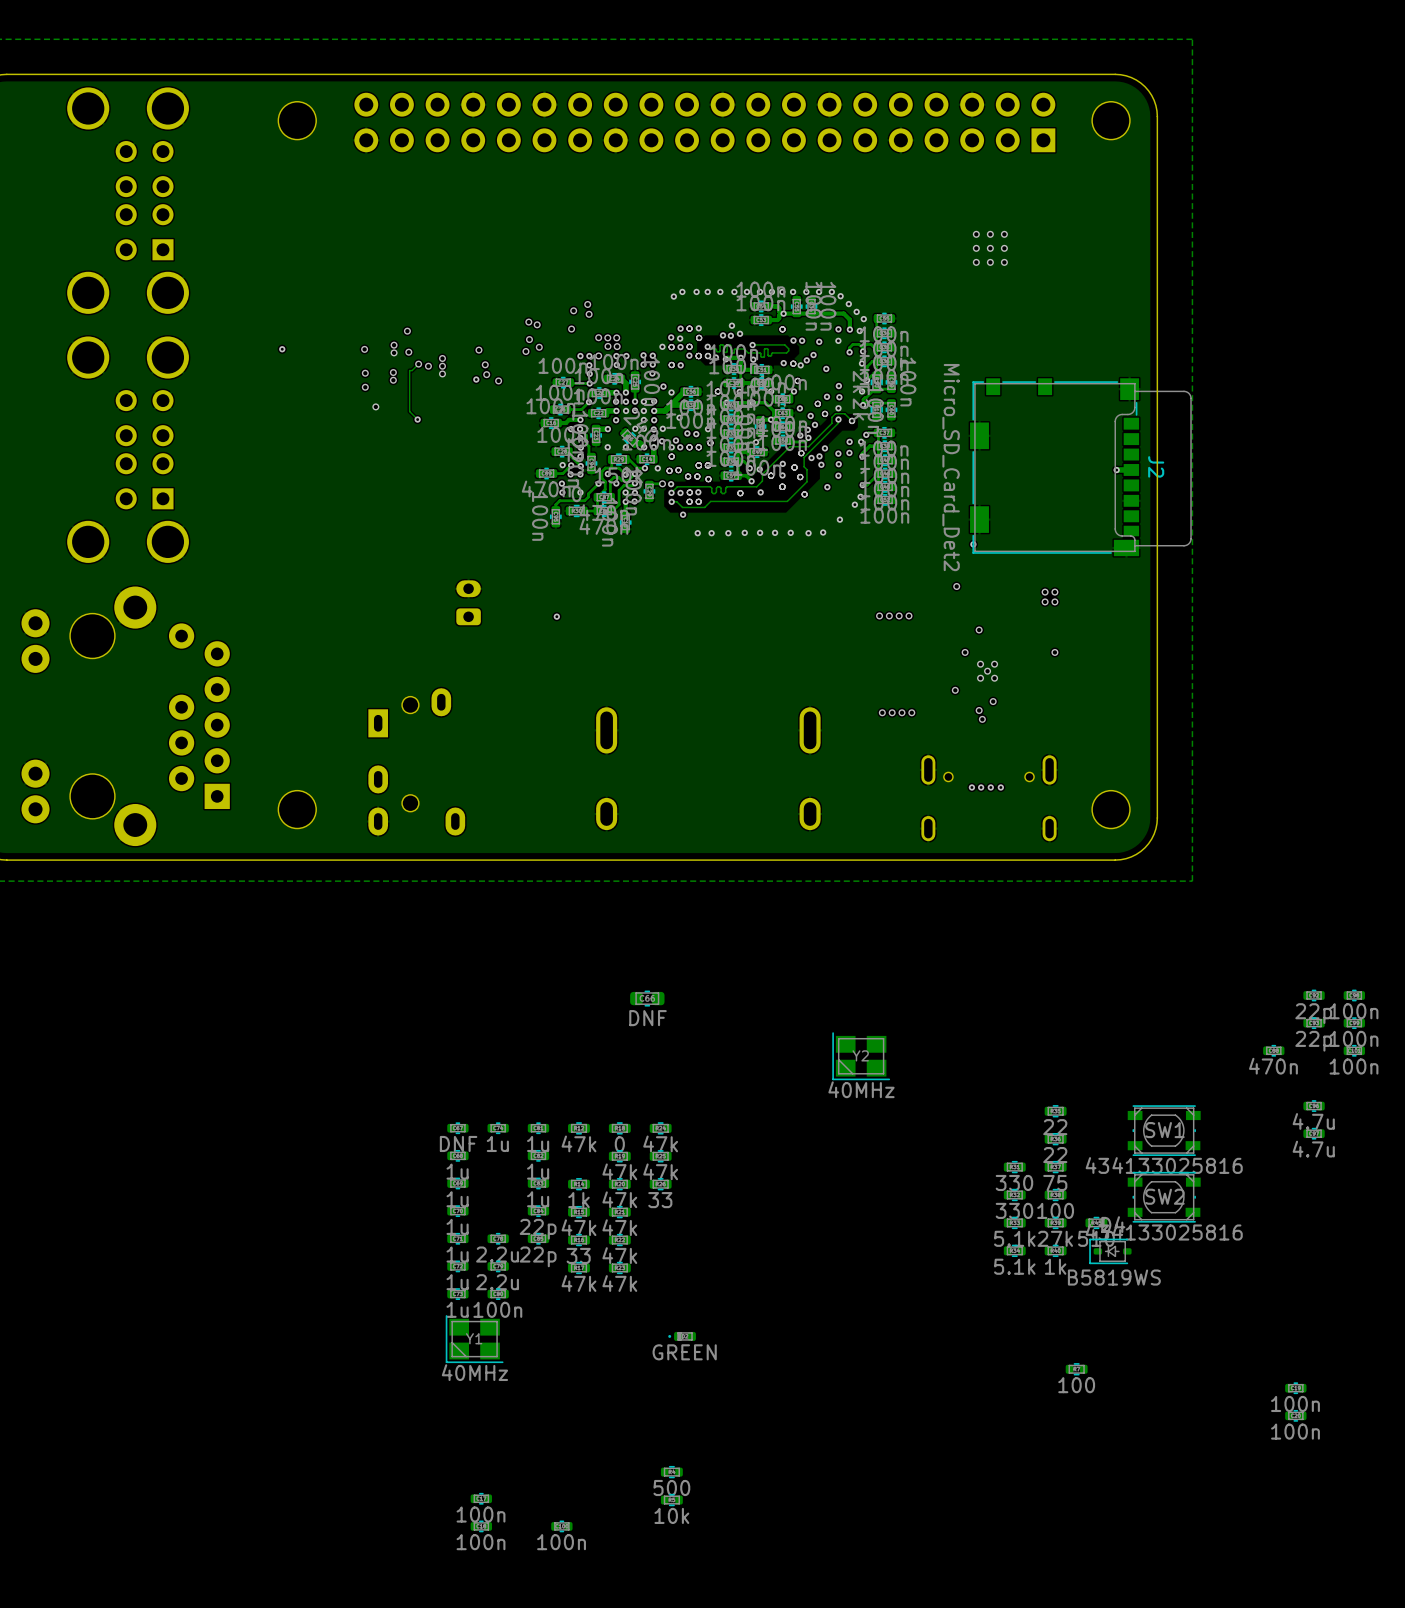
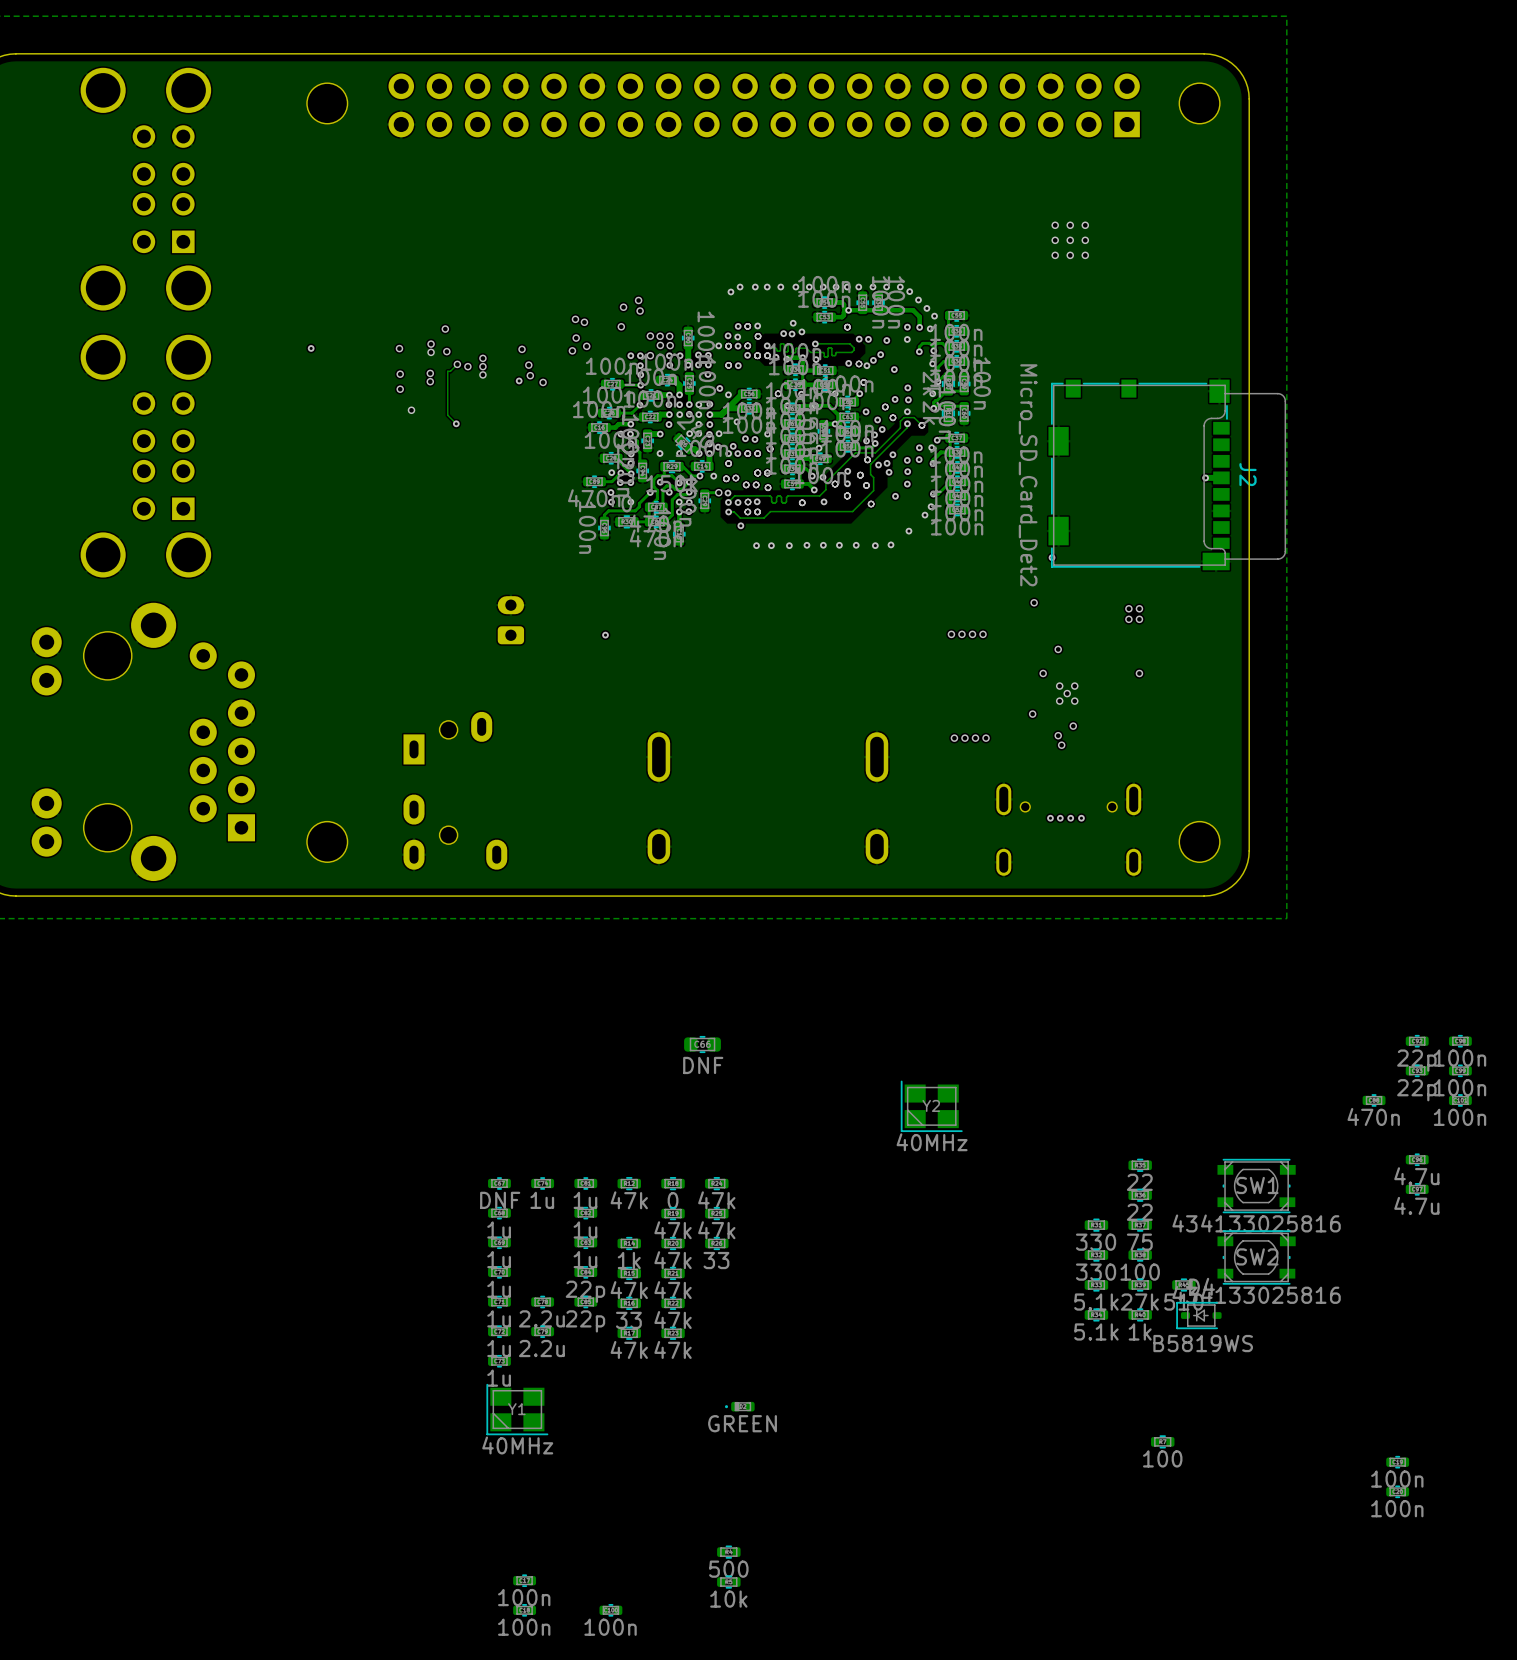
track: none -> (688, 345) (688, 365)
via: none -> (688, 365)
part rotation: 0° (498, 1294) -> 90° clockwise (688, 338)
part position: (498, 1294) -> (688, 338)

